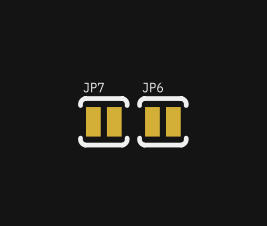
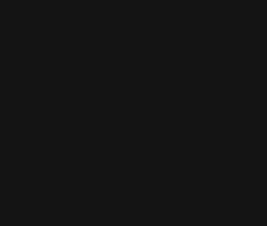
JP7: (103, 121) -> none
JP6: (162, 121) -> none

